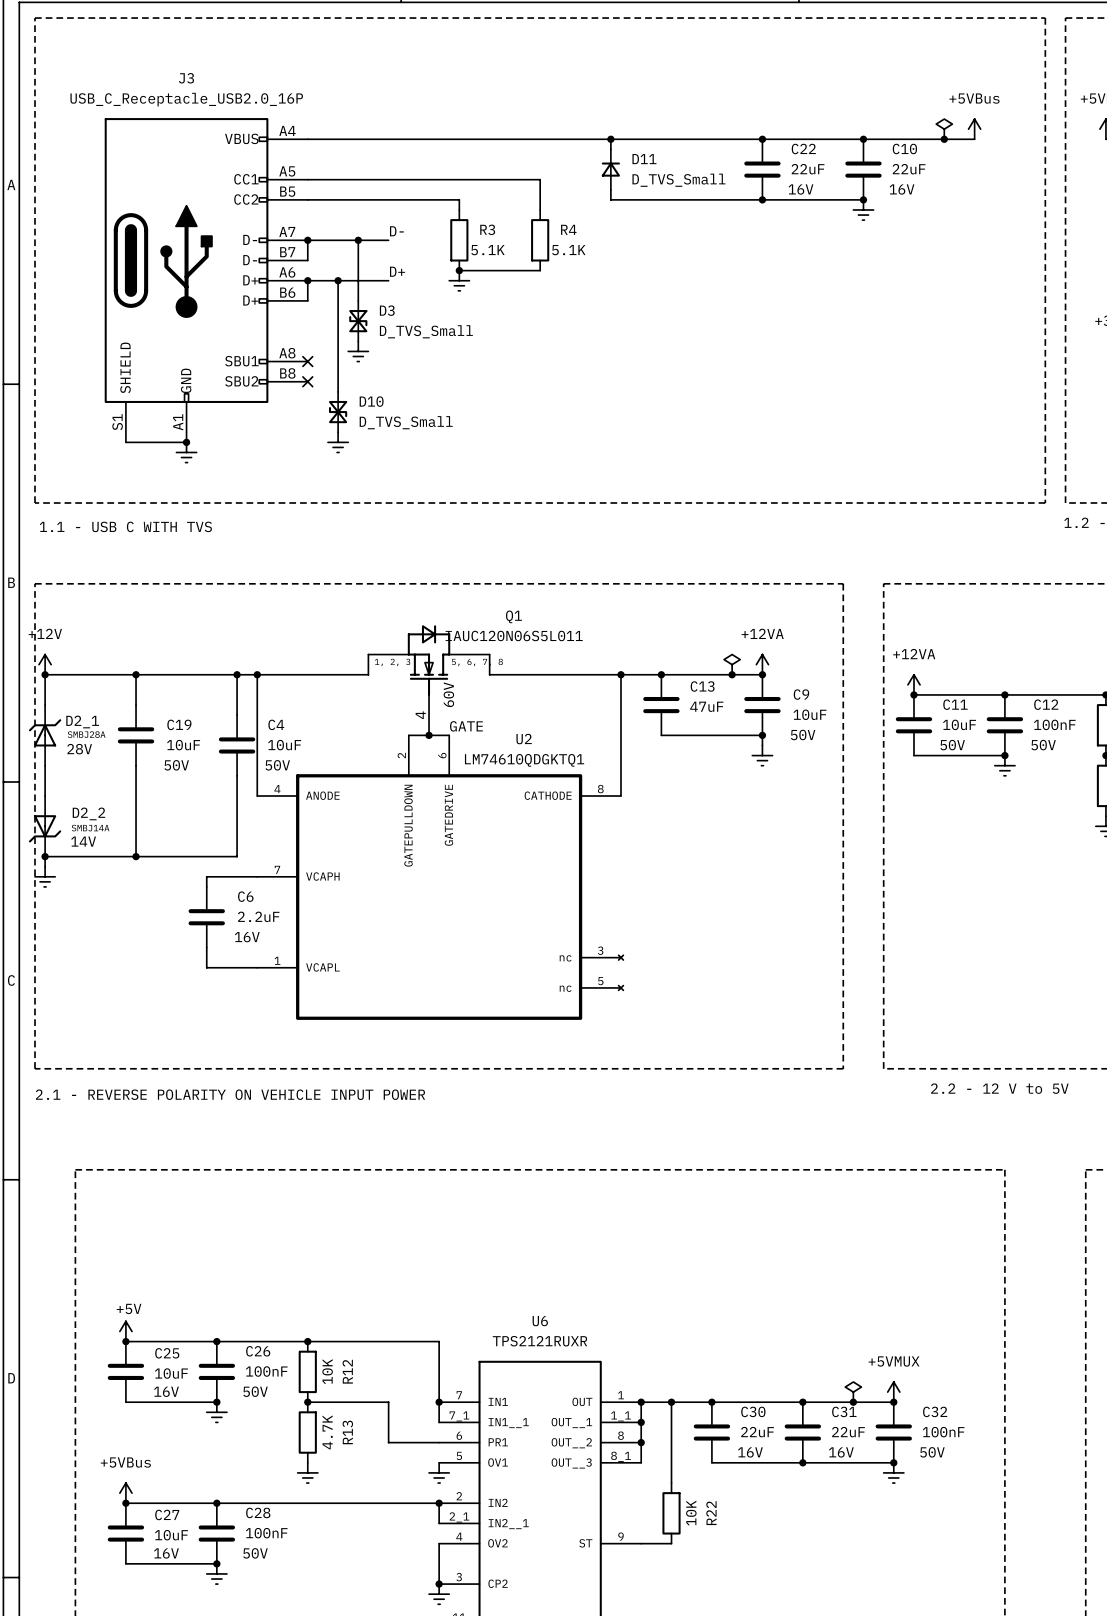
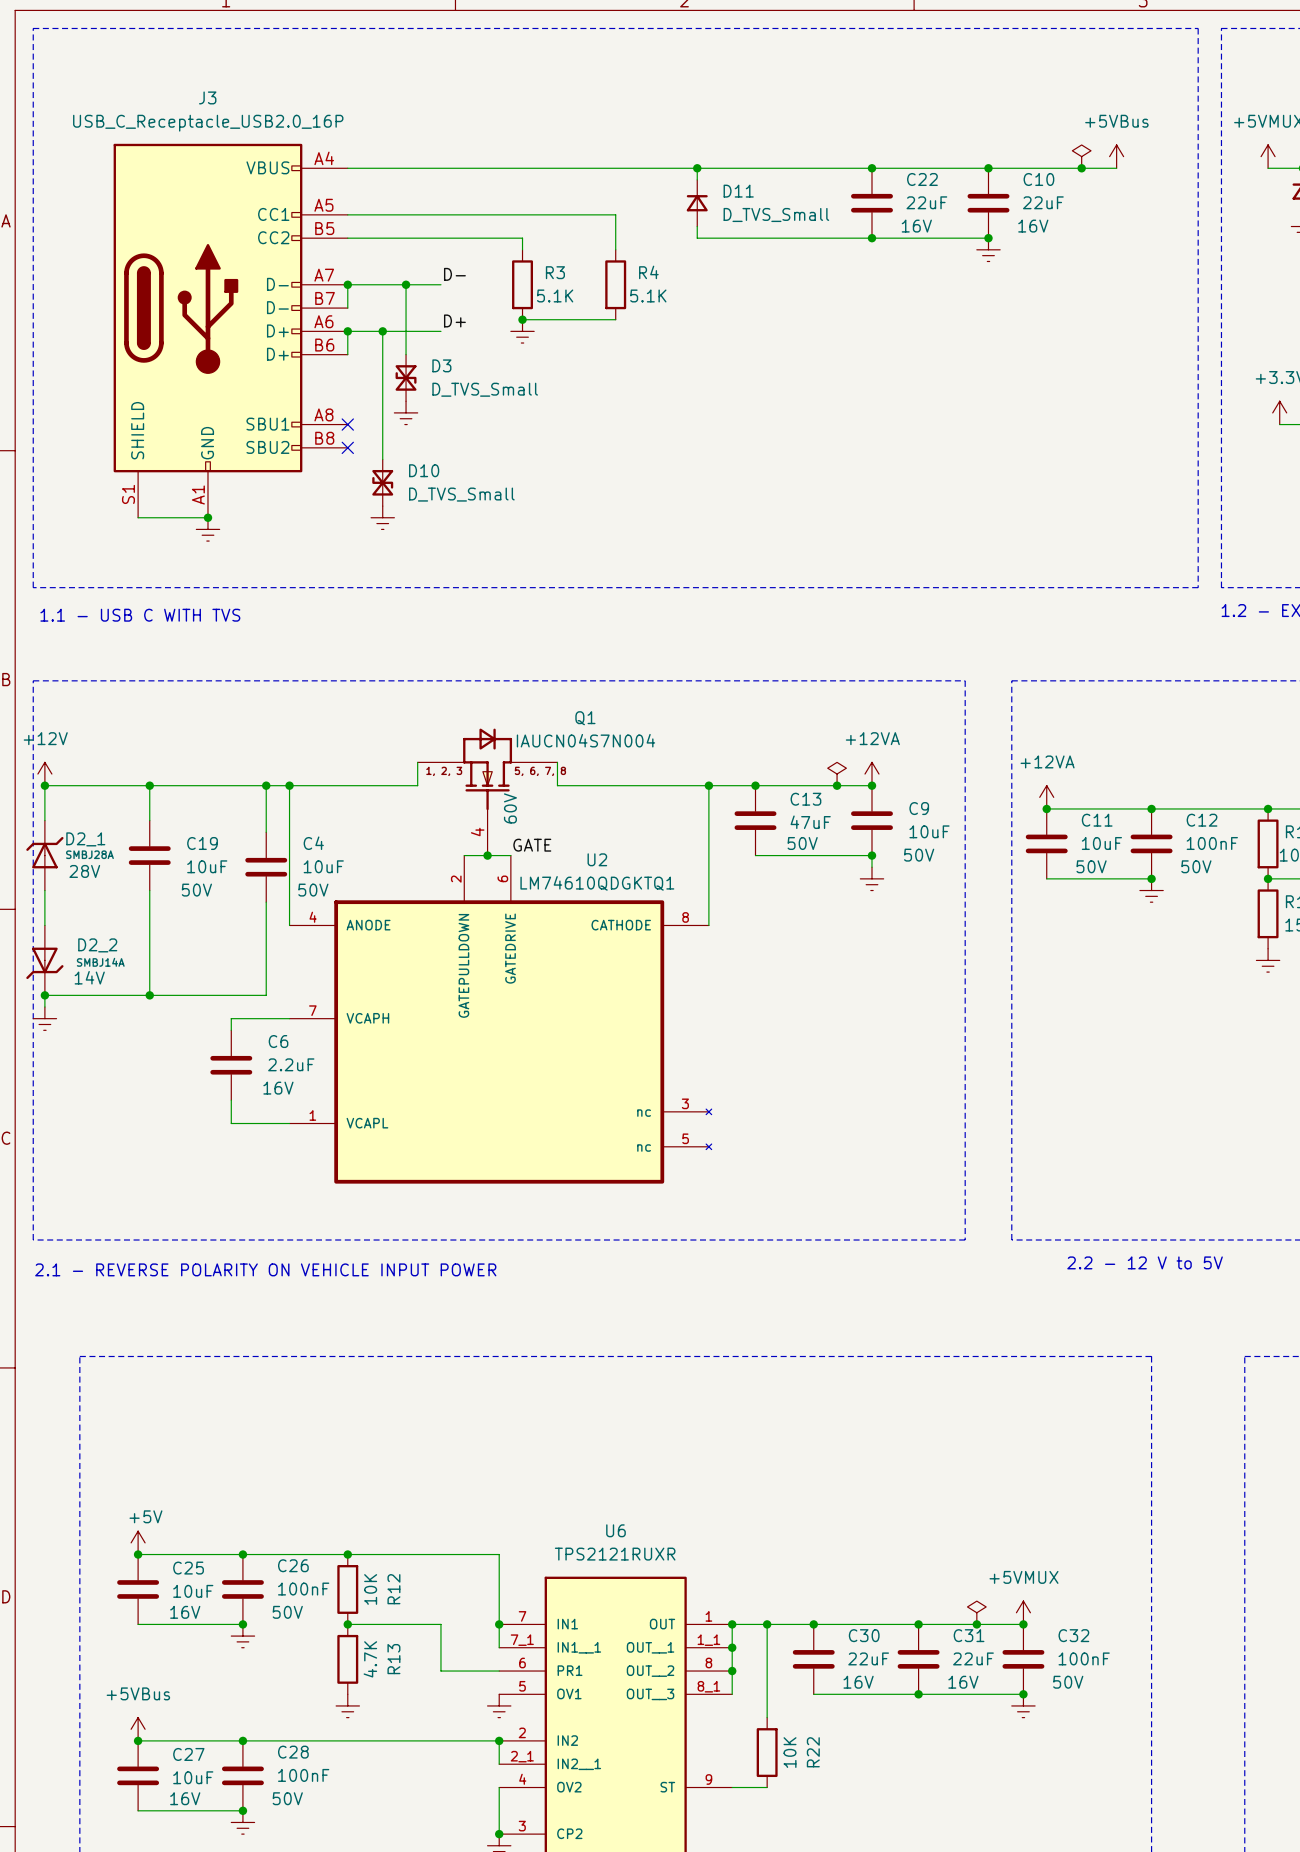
Q1 value: IAUC120N06S5L011 (514, 635) -> IAUCN04S7N004 (585, 740)
C13 text: none -> 50V (802, 843)

